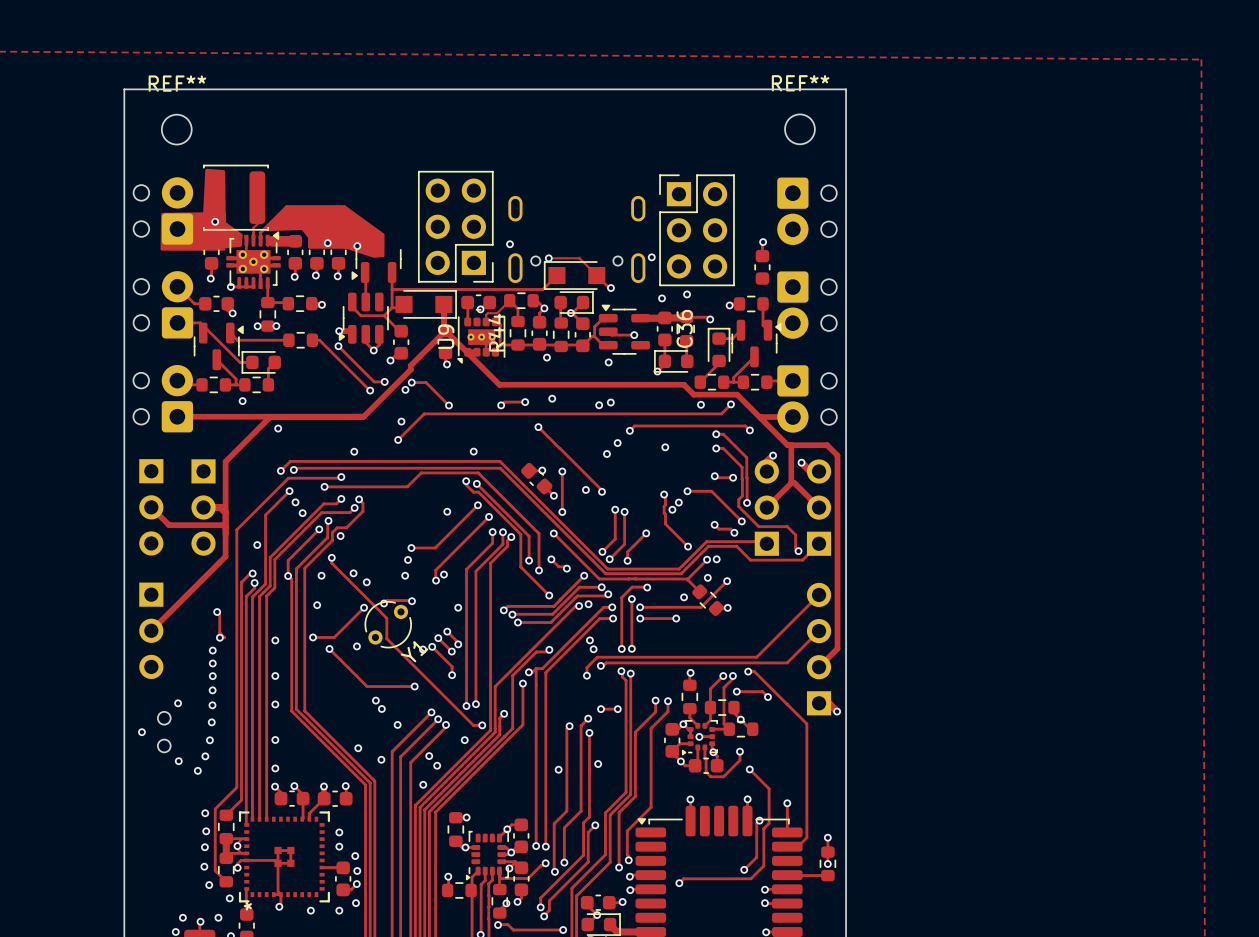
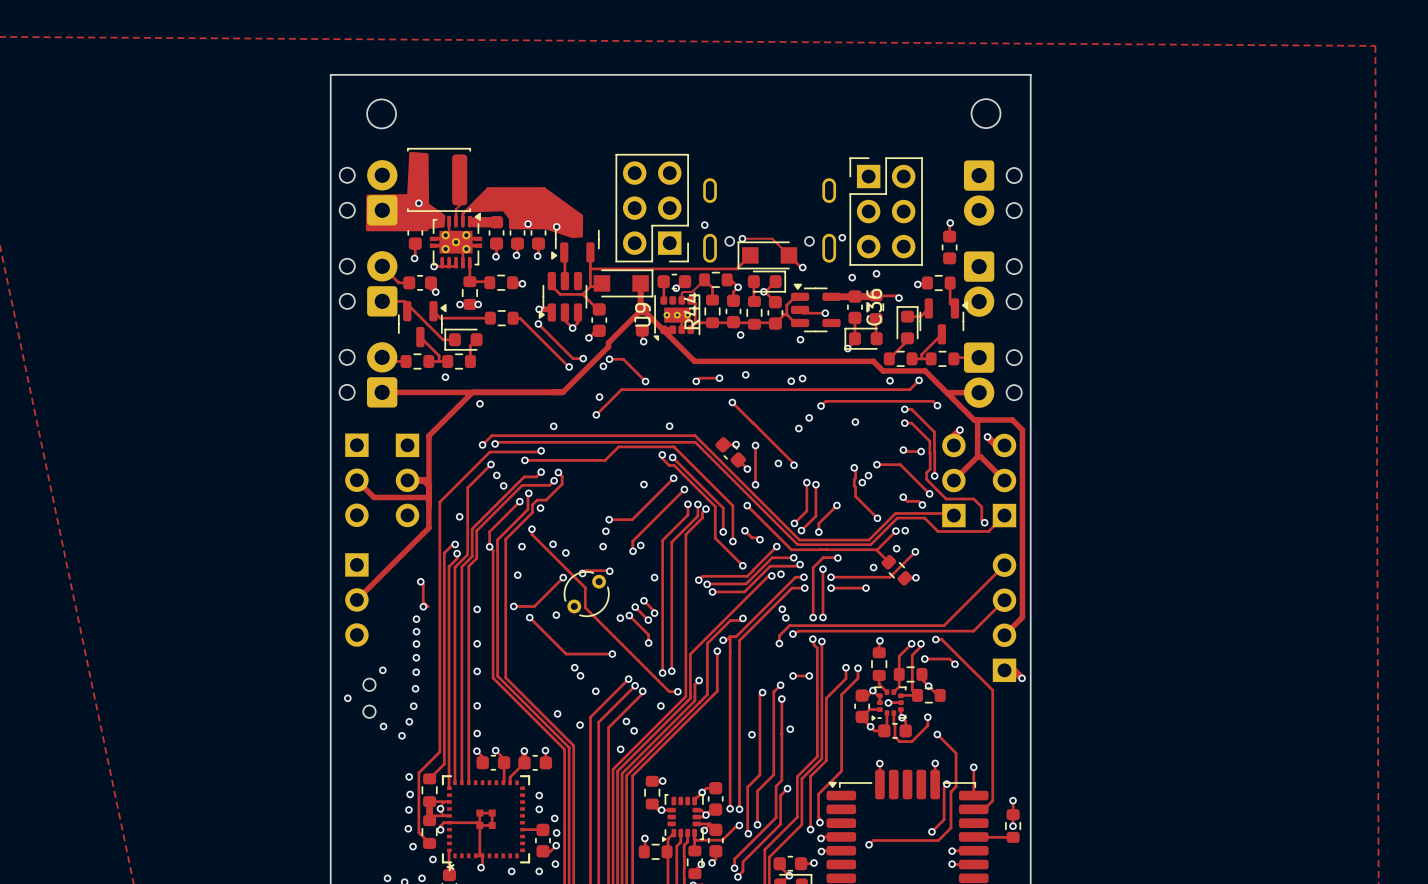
REF** name: REF** (177, 83) -> none
REF** name: REF** (800, 83) -> none
Y1 name: Y1 (414, 651) -> none

